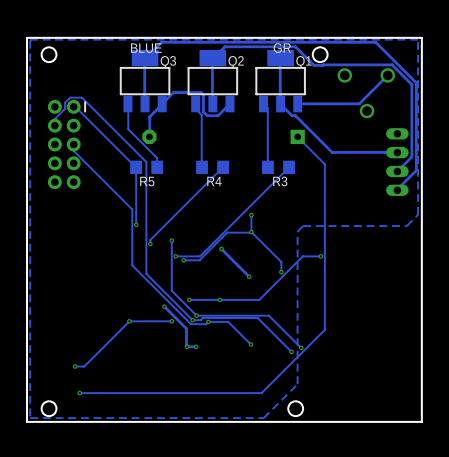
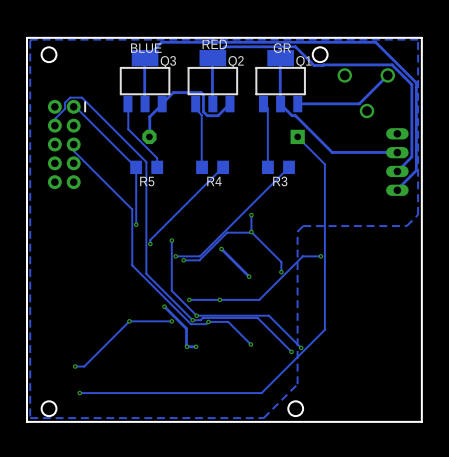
text: none -> RED (214, 44)

